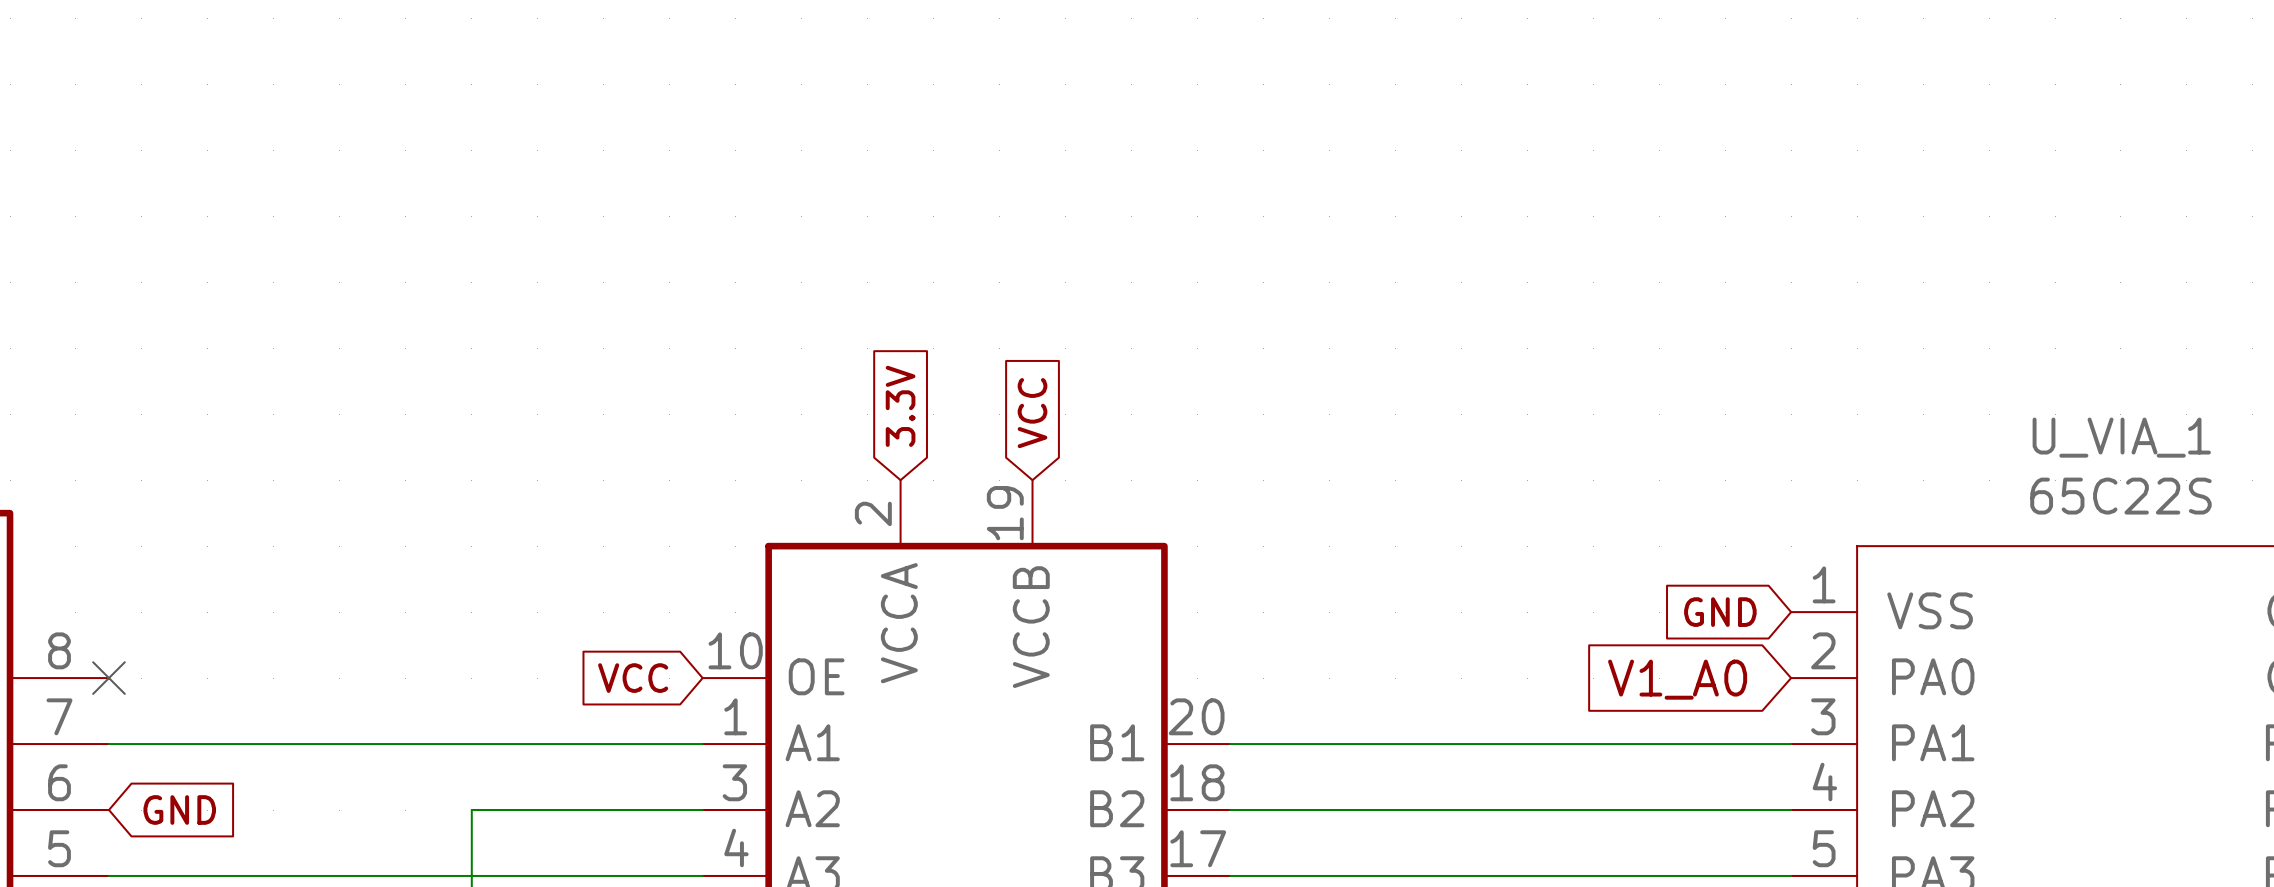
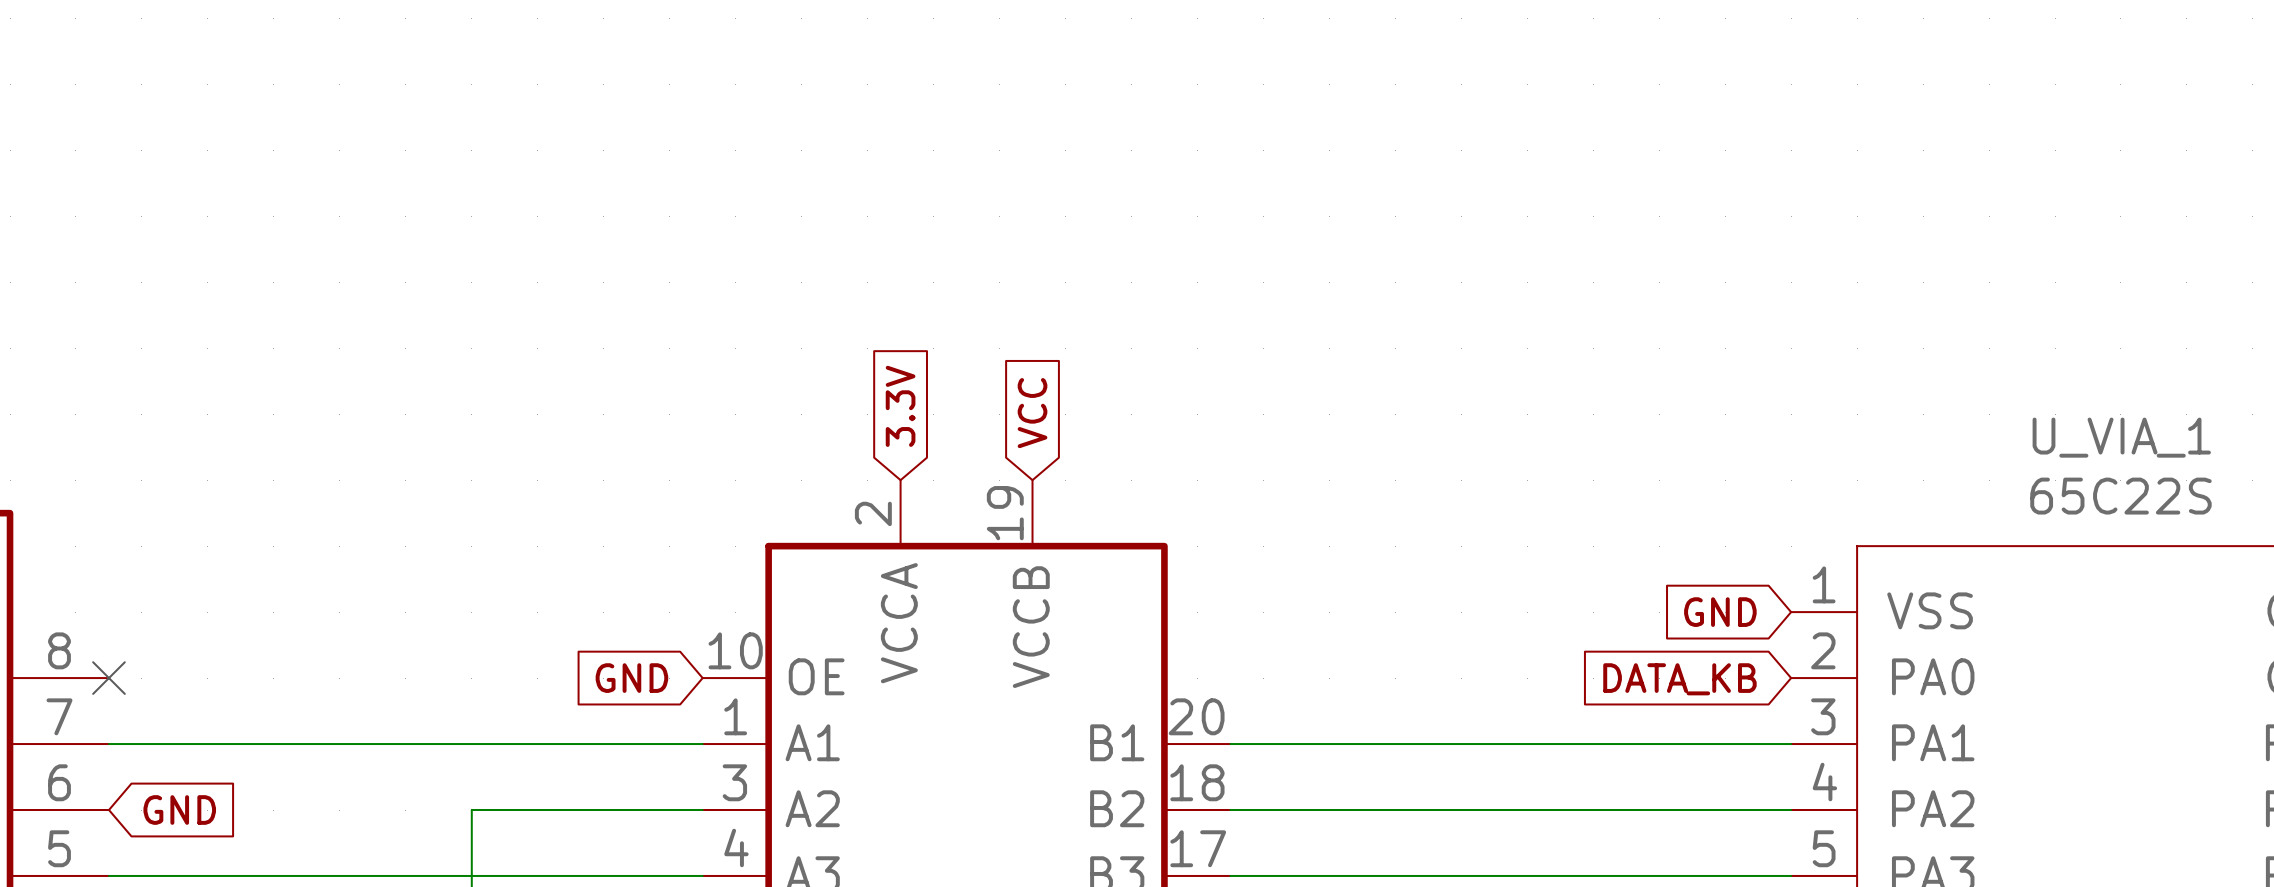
global label: VCC (633, 678) -> GND (631, 678)
global label: V1_A0 (1677, 679) -> DATA_KB (1679, 679)

